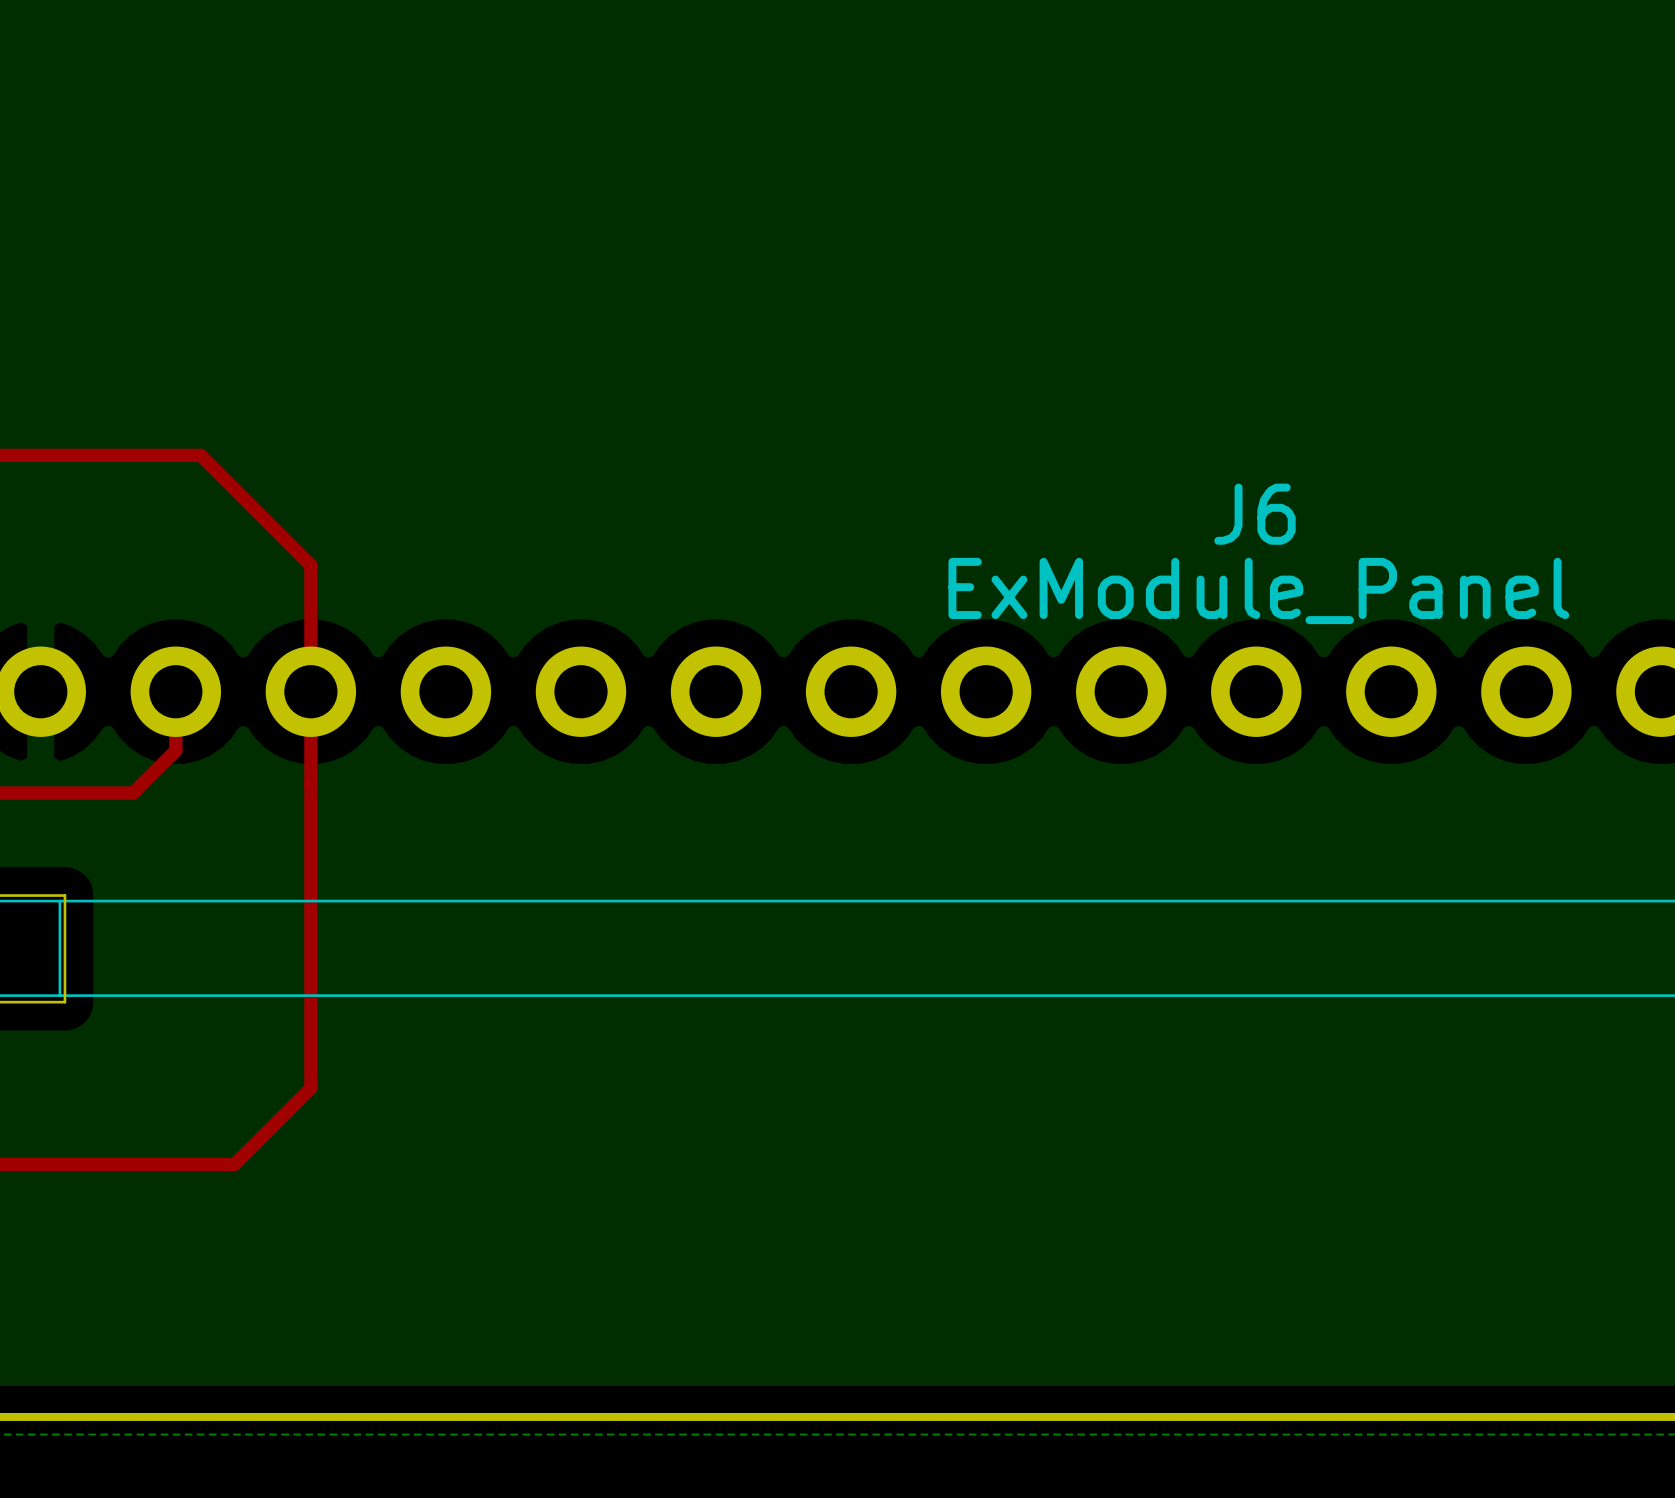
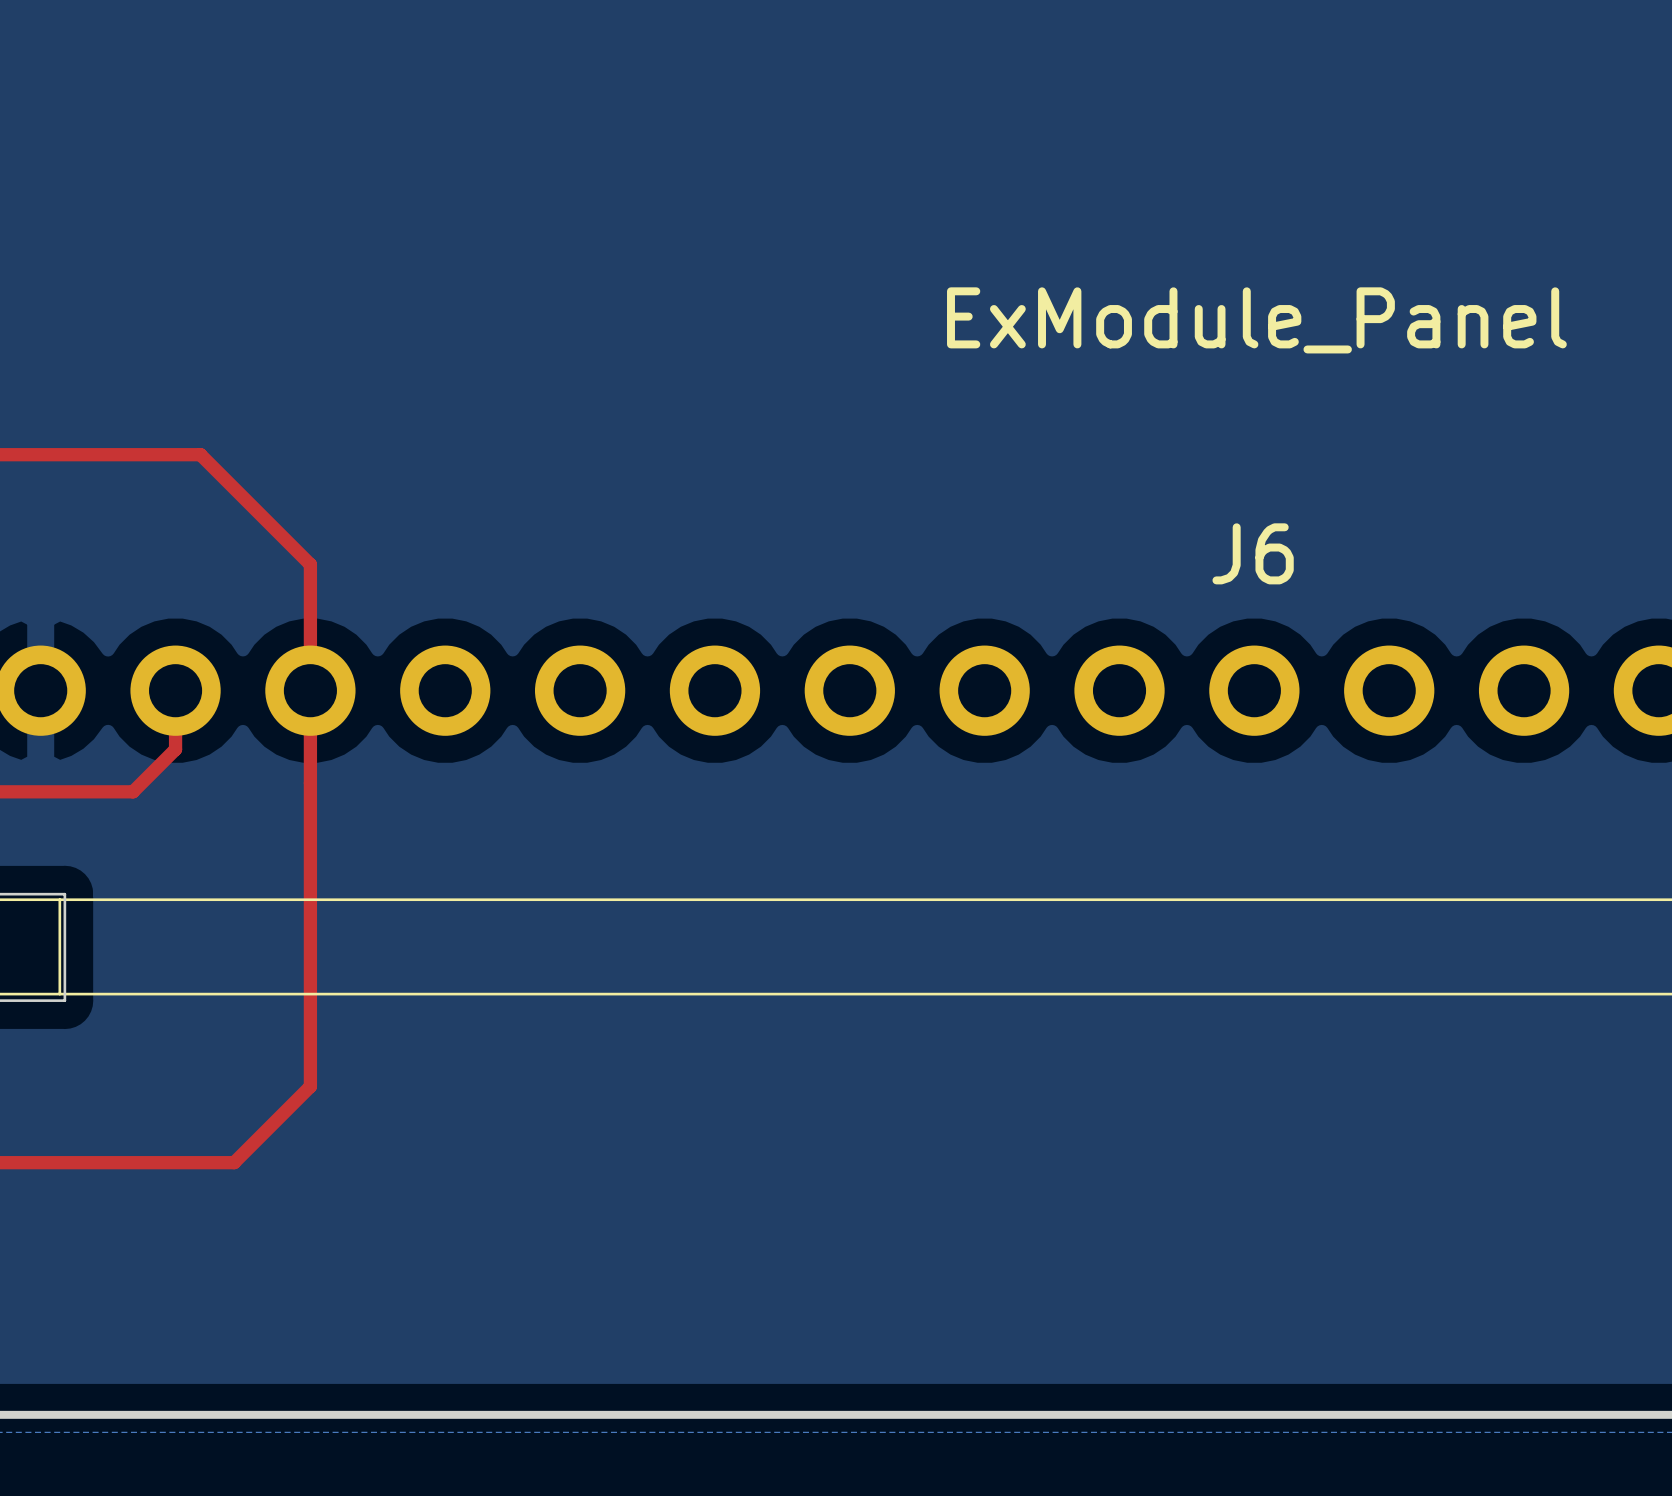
J6 name position: J6 (1255, 514) -> J6 (1253, 553)
J6 value position: ExModule_Panel (1258, 590) -> ExModule_Panel (1256, 320)

